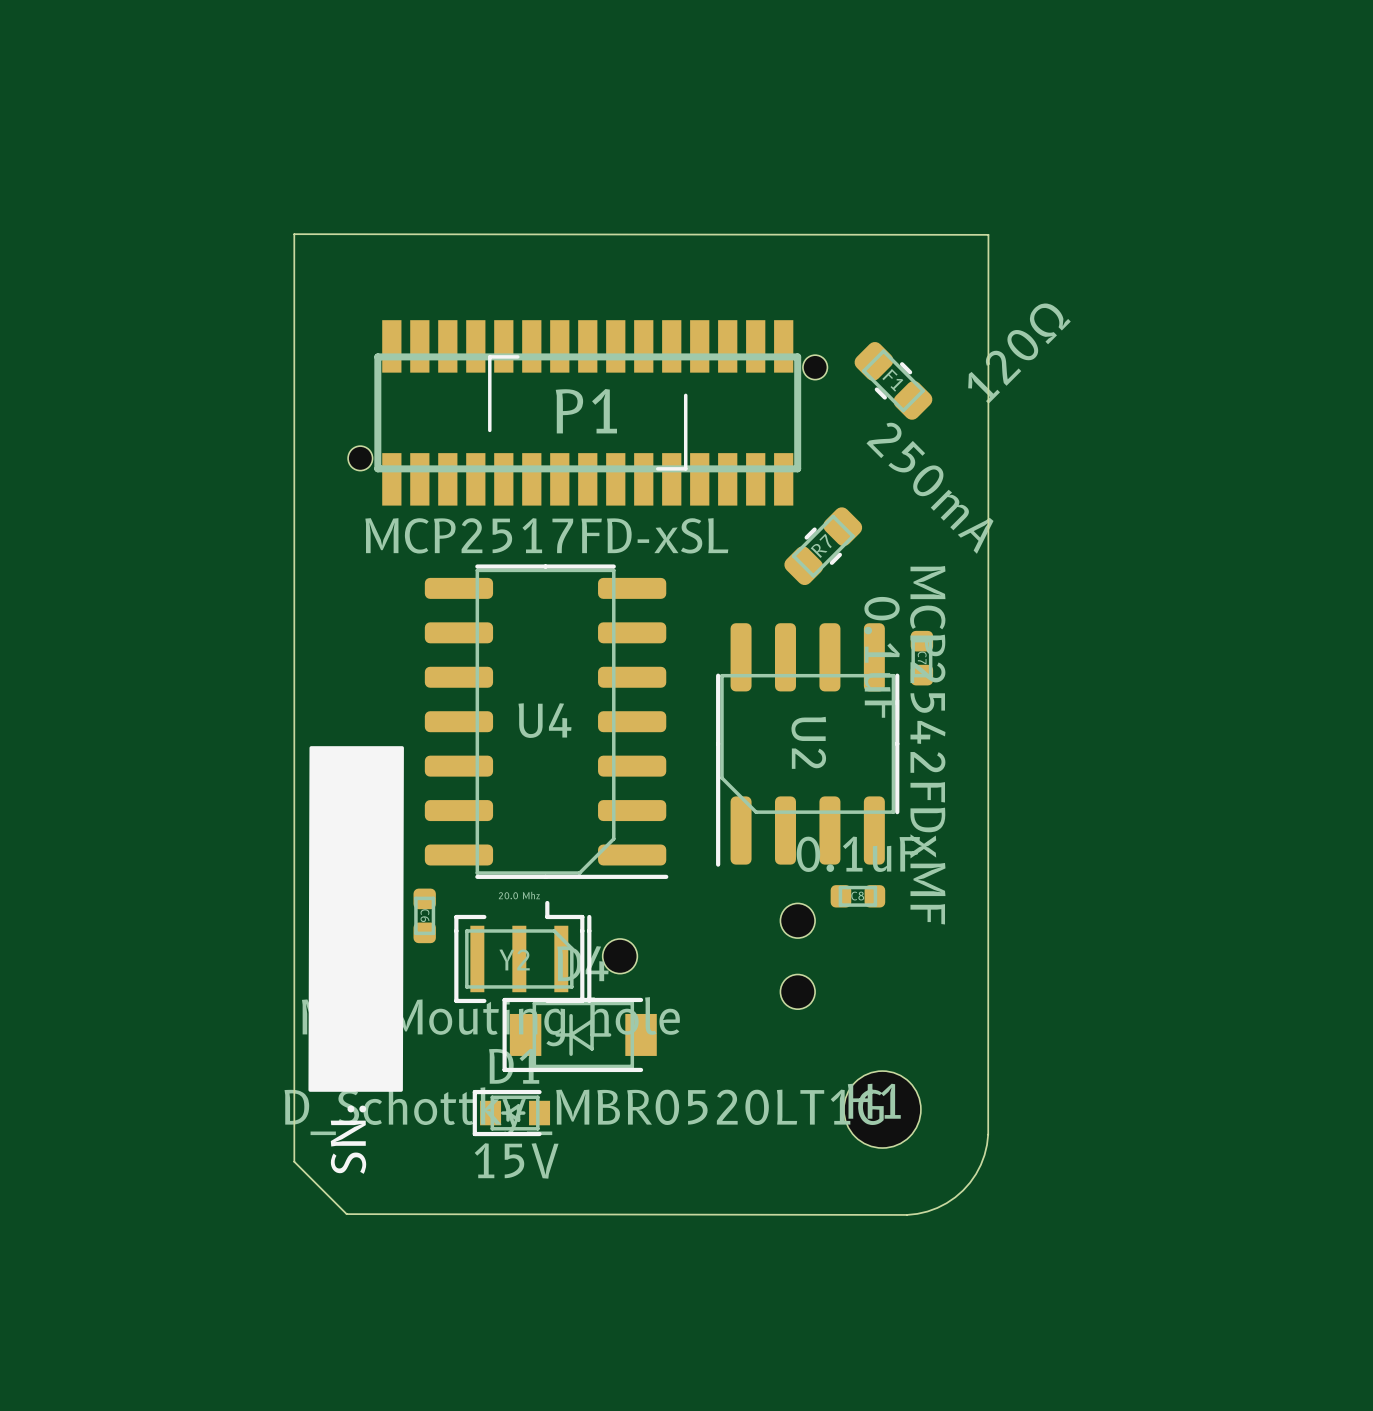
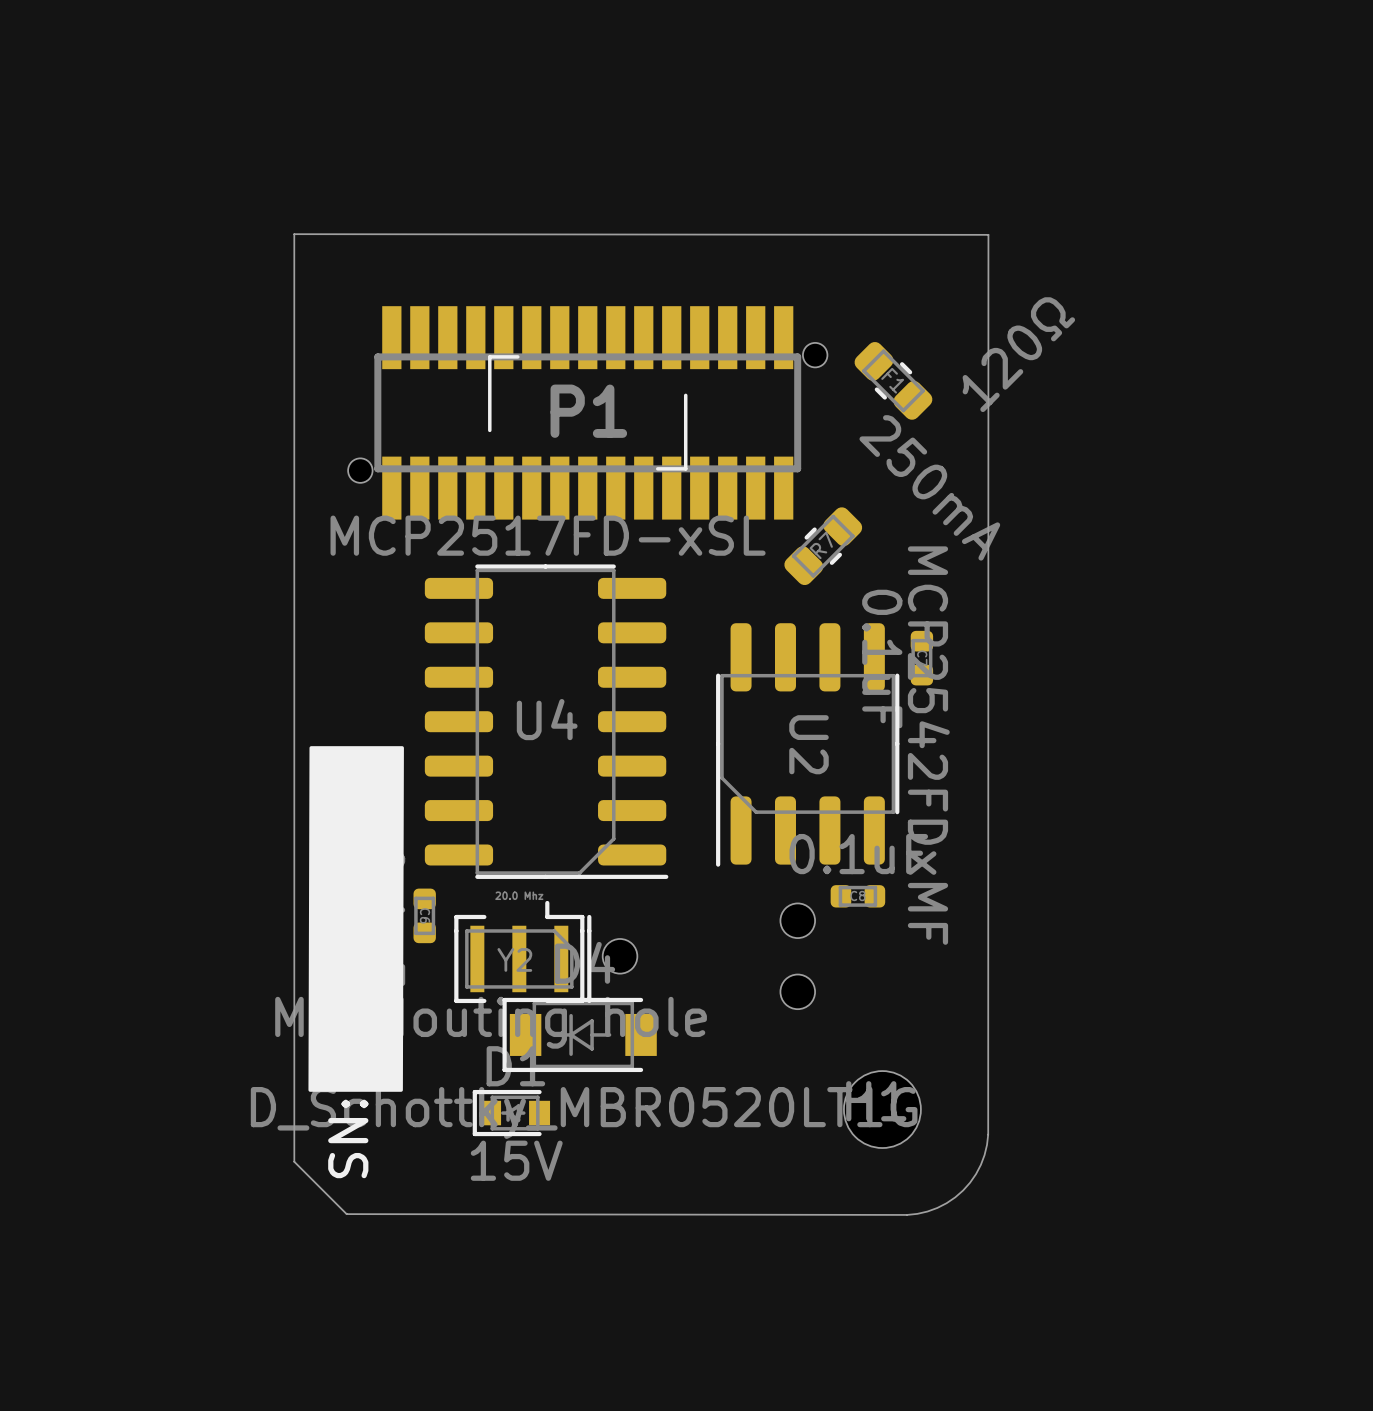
P1 footprint: [348, 320, 828, 506] -> [348, 306, 828, 520]

